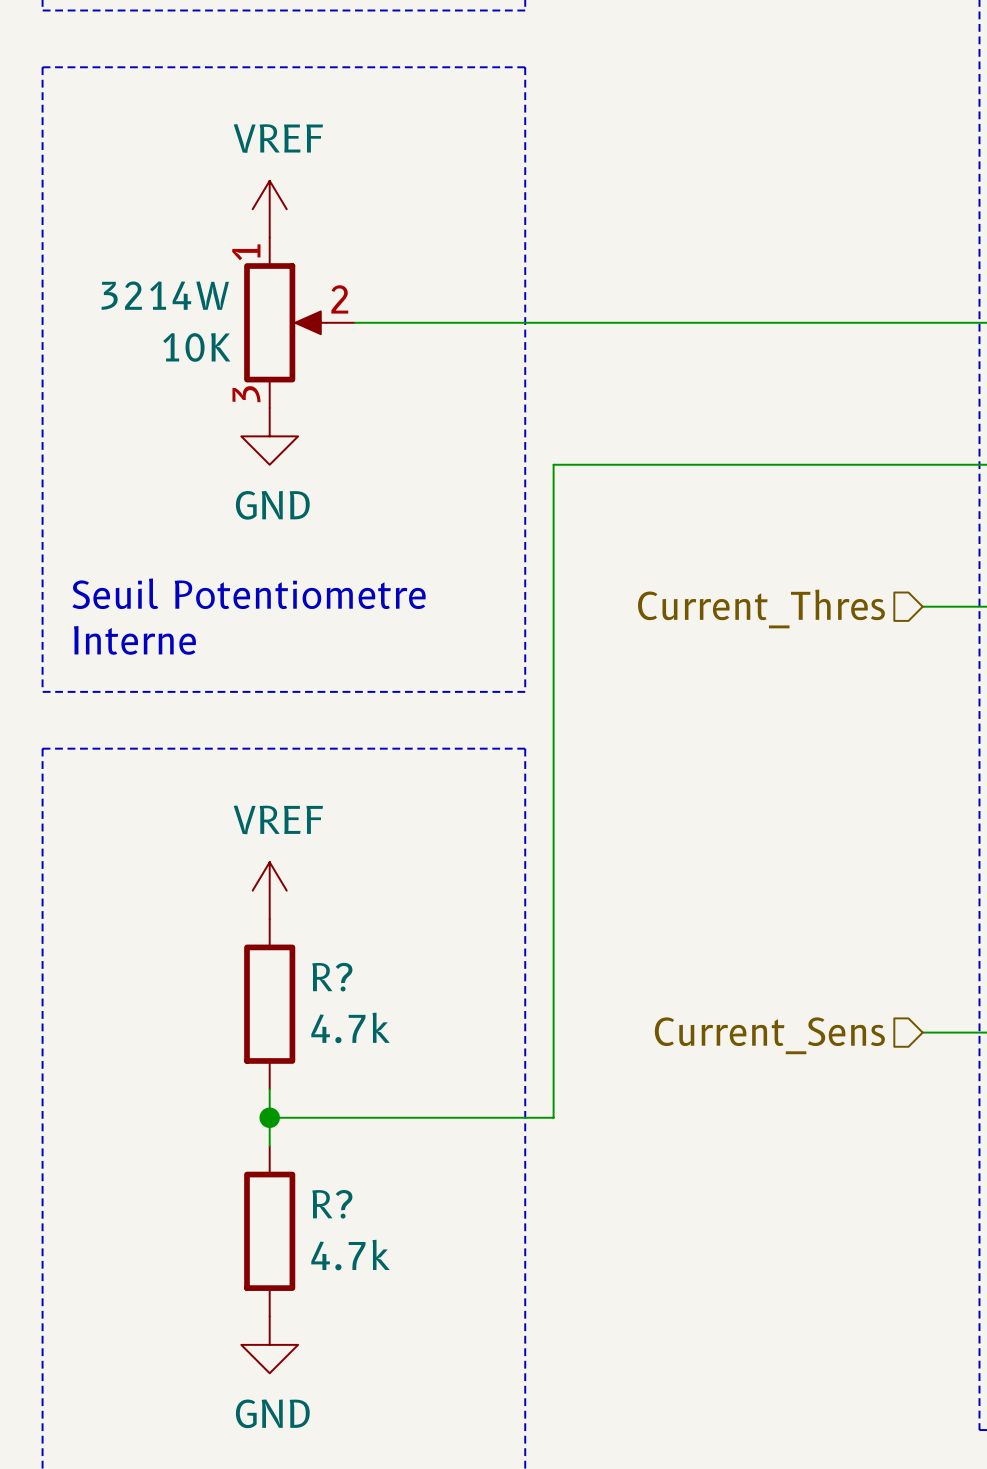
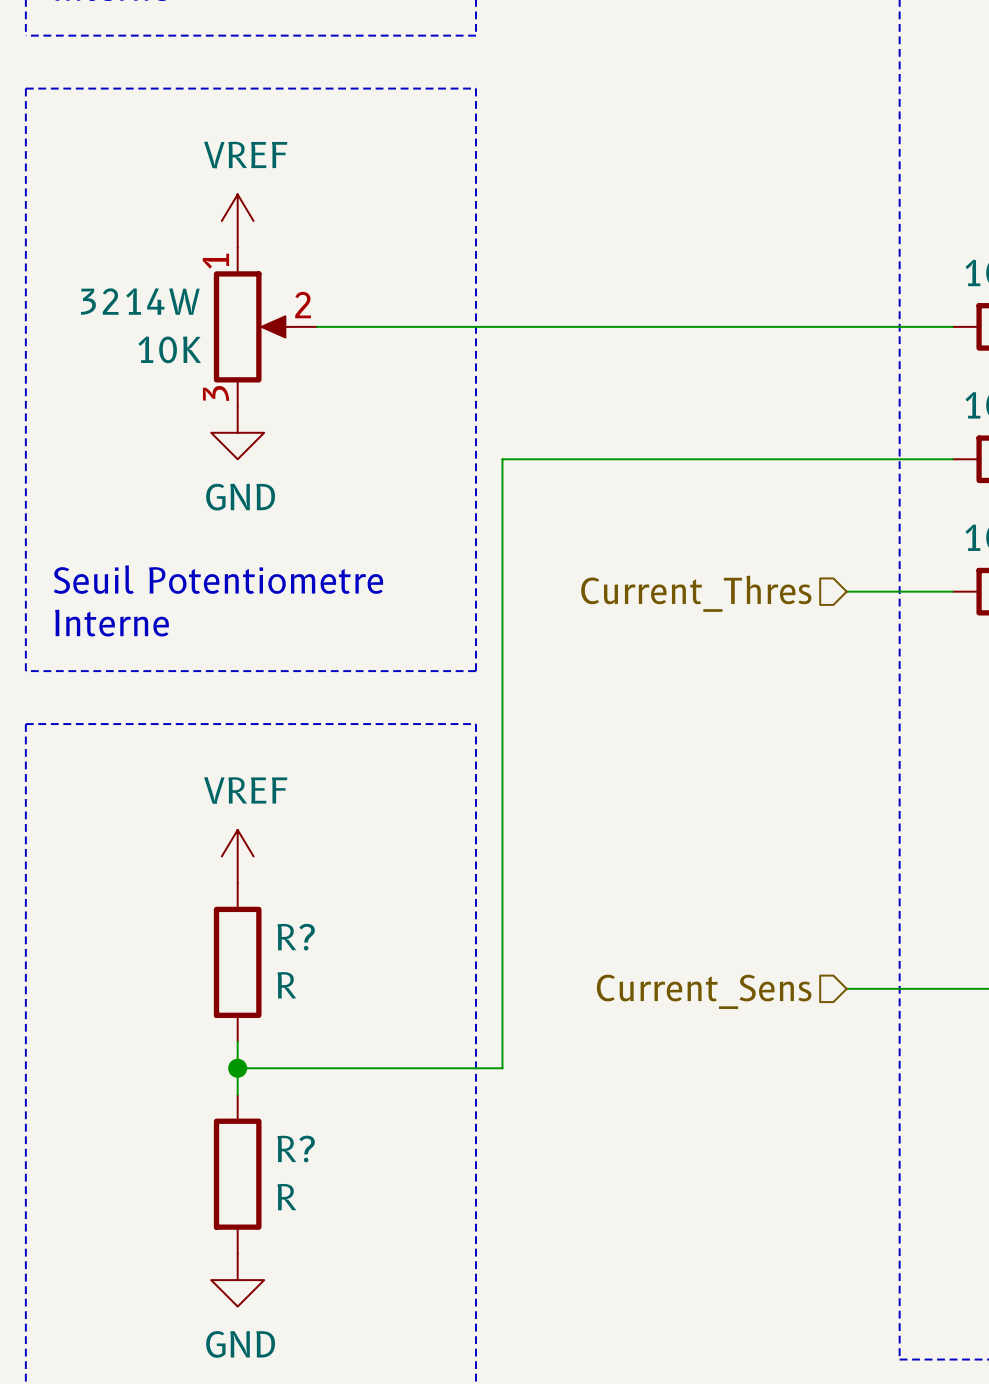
R? value: 4.7k (350, 1027) -> R (286, 985)
R? value: 4.7k (350, 1255) -> R (286, 1197)

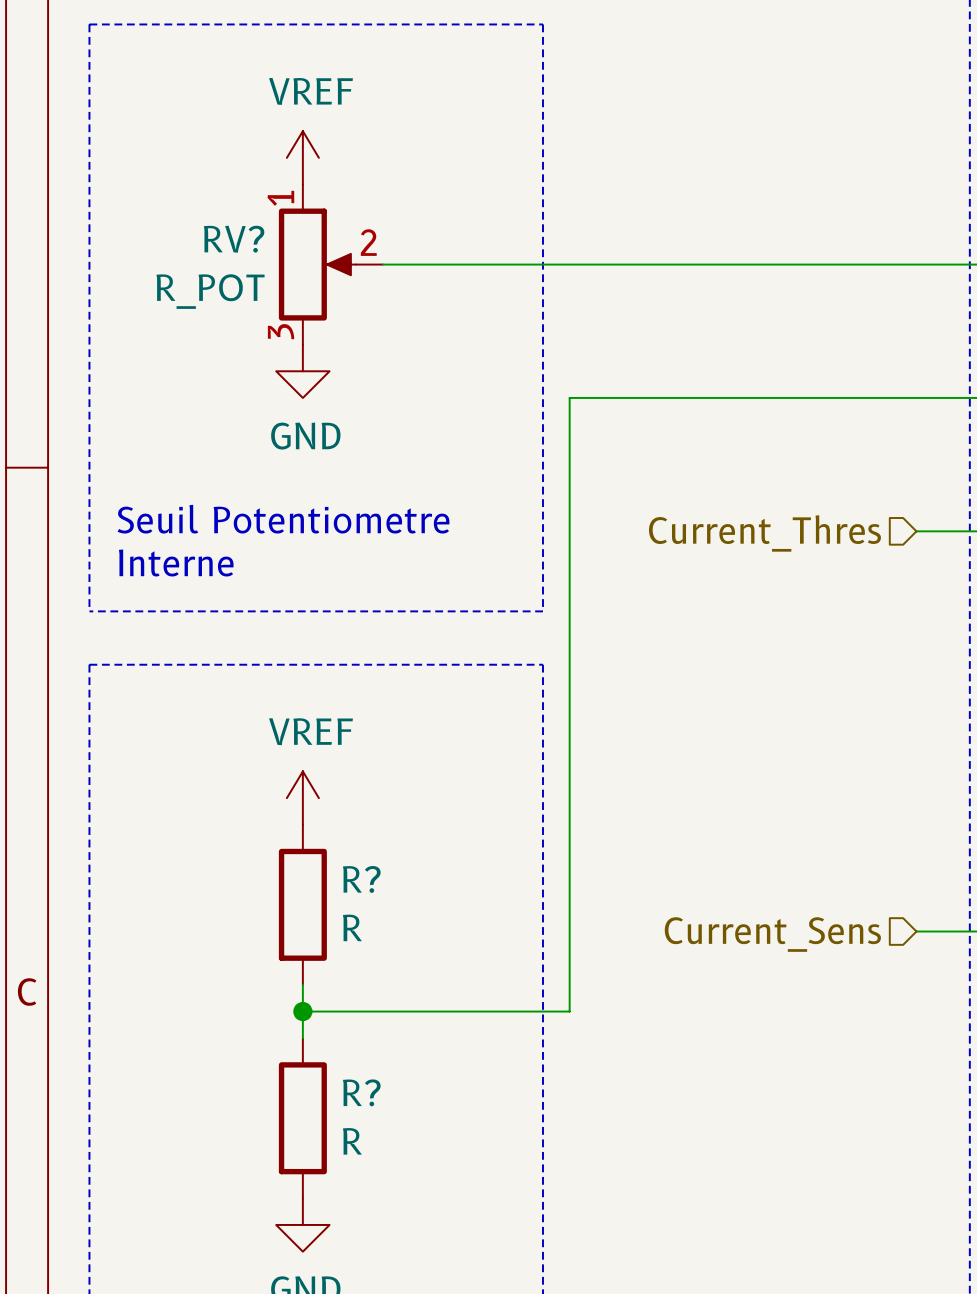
3214W name: 3214W (140, 301) -> RV? (234, 239)
3214W value: 10K (169, 349) -> R_POT (210, 291)

